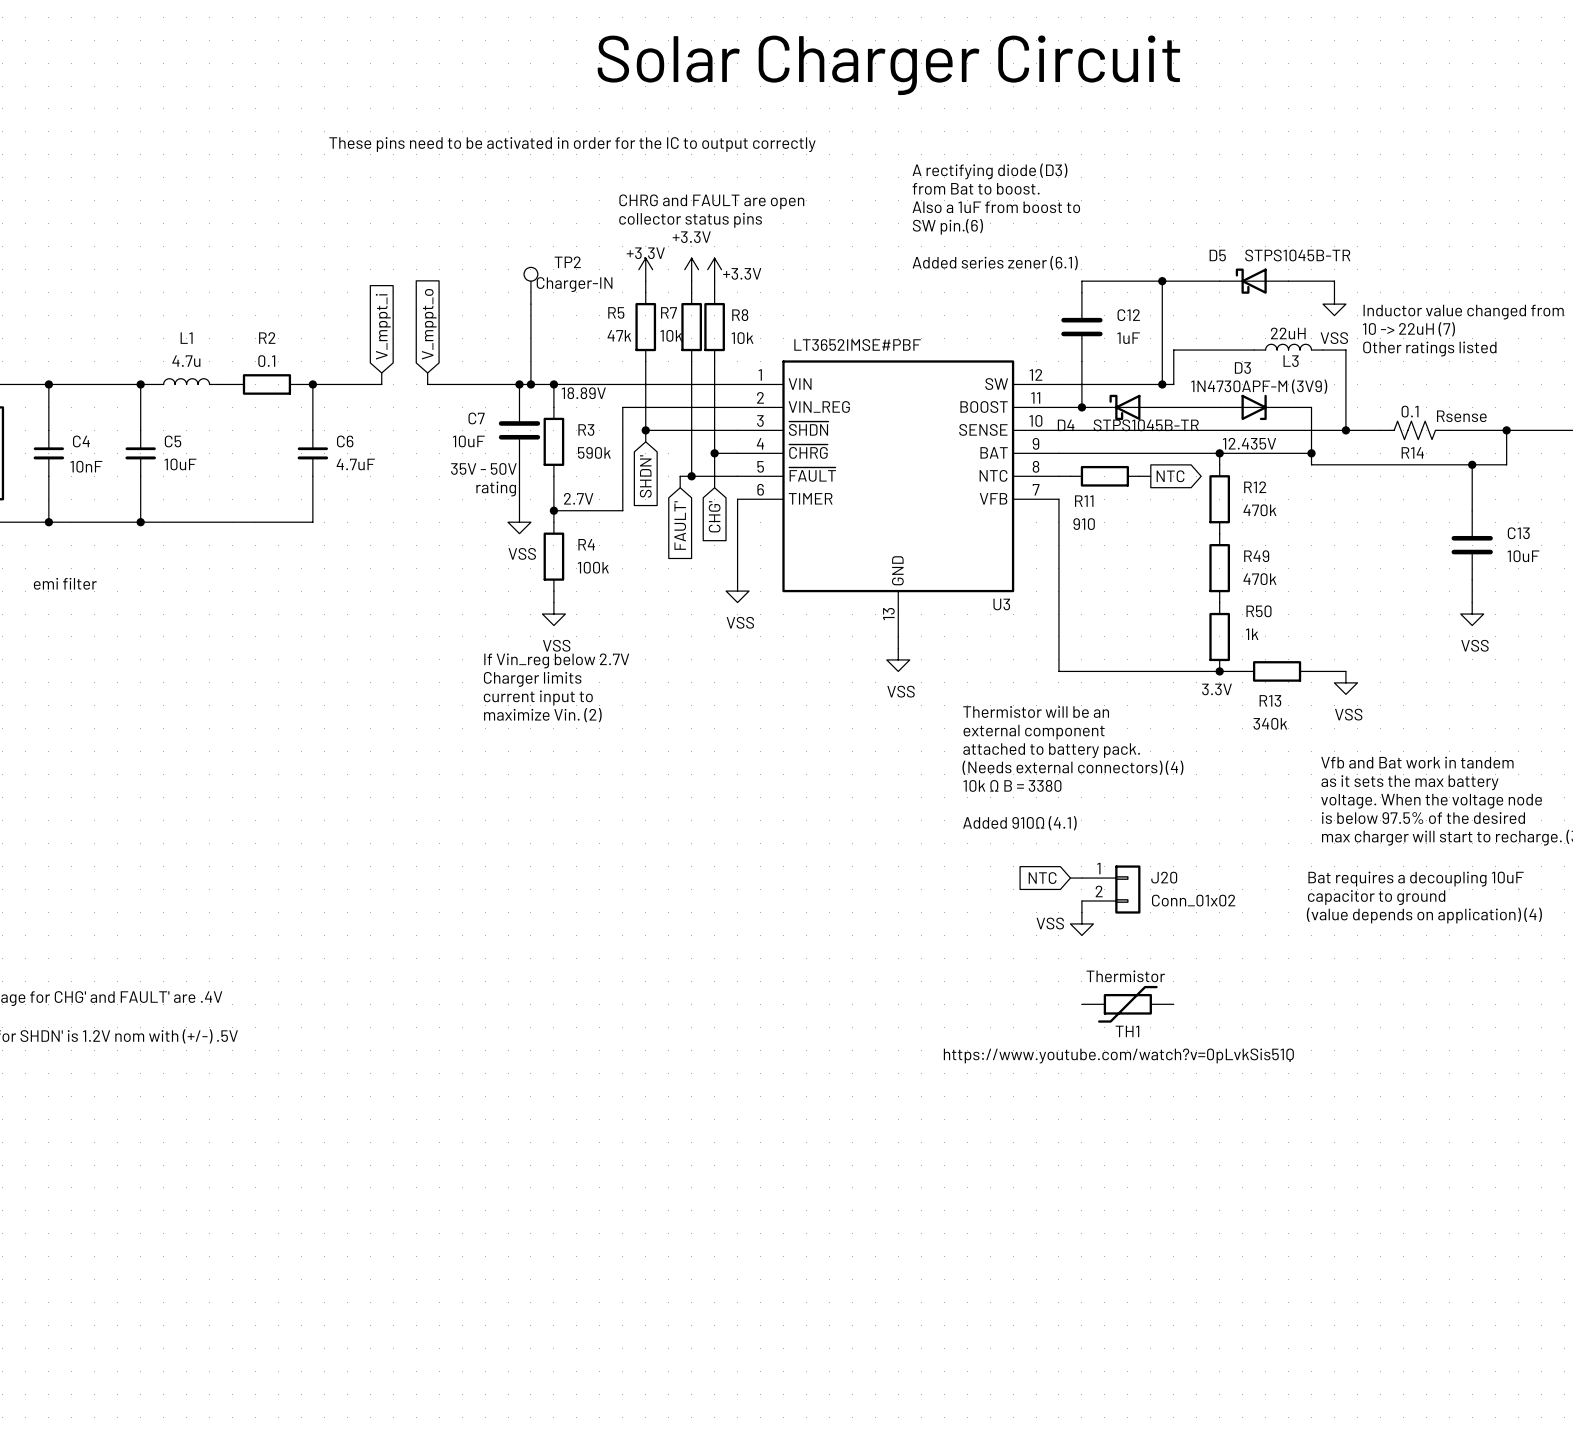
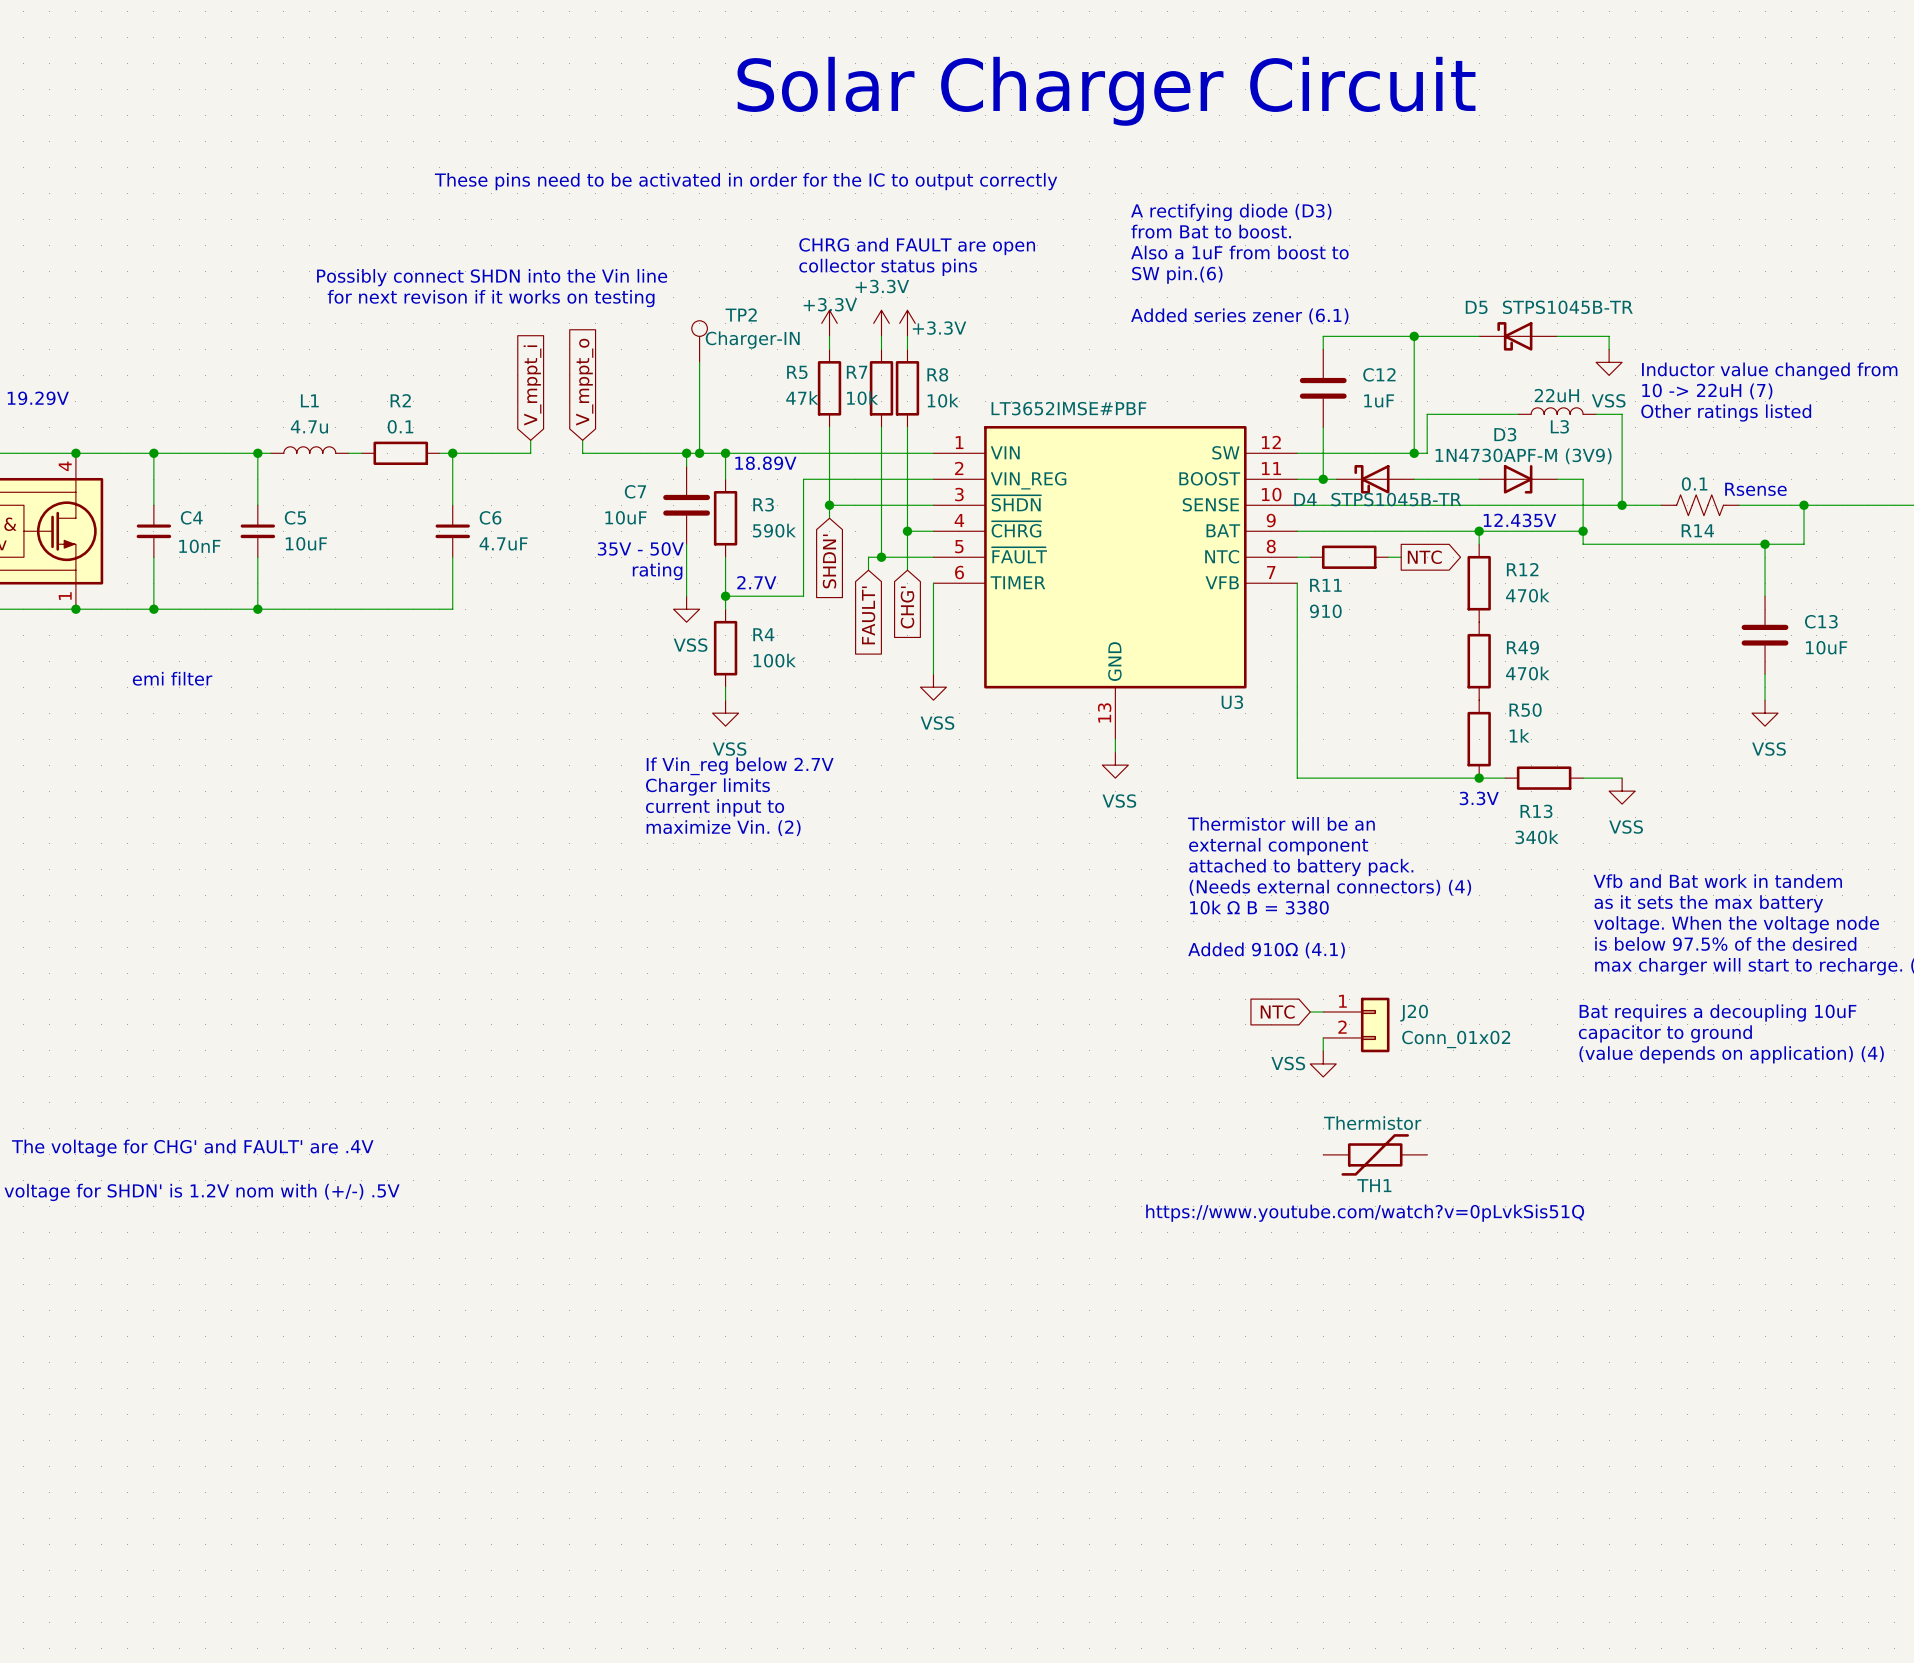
text: none -> Possibly connect SHDN into the Vin line (492, 277)
text: none -> for next revison if it works on testing (491, 298)

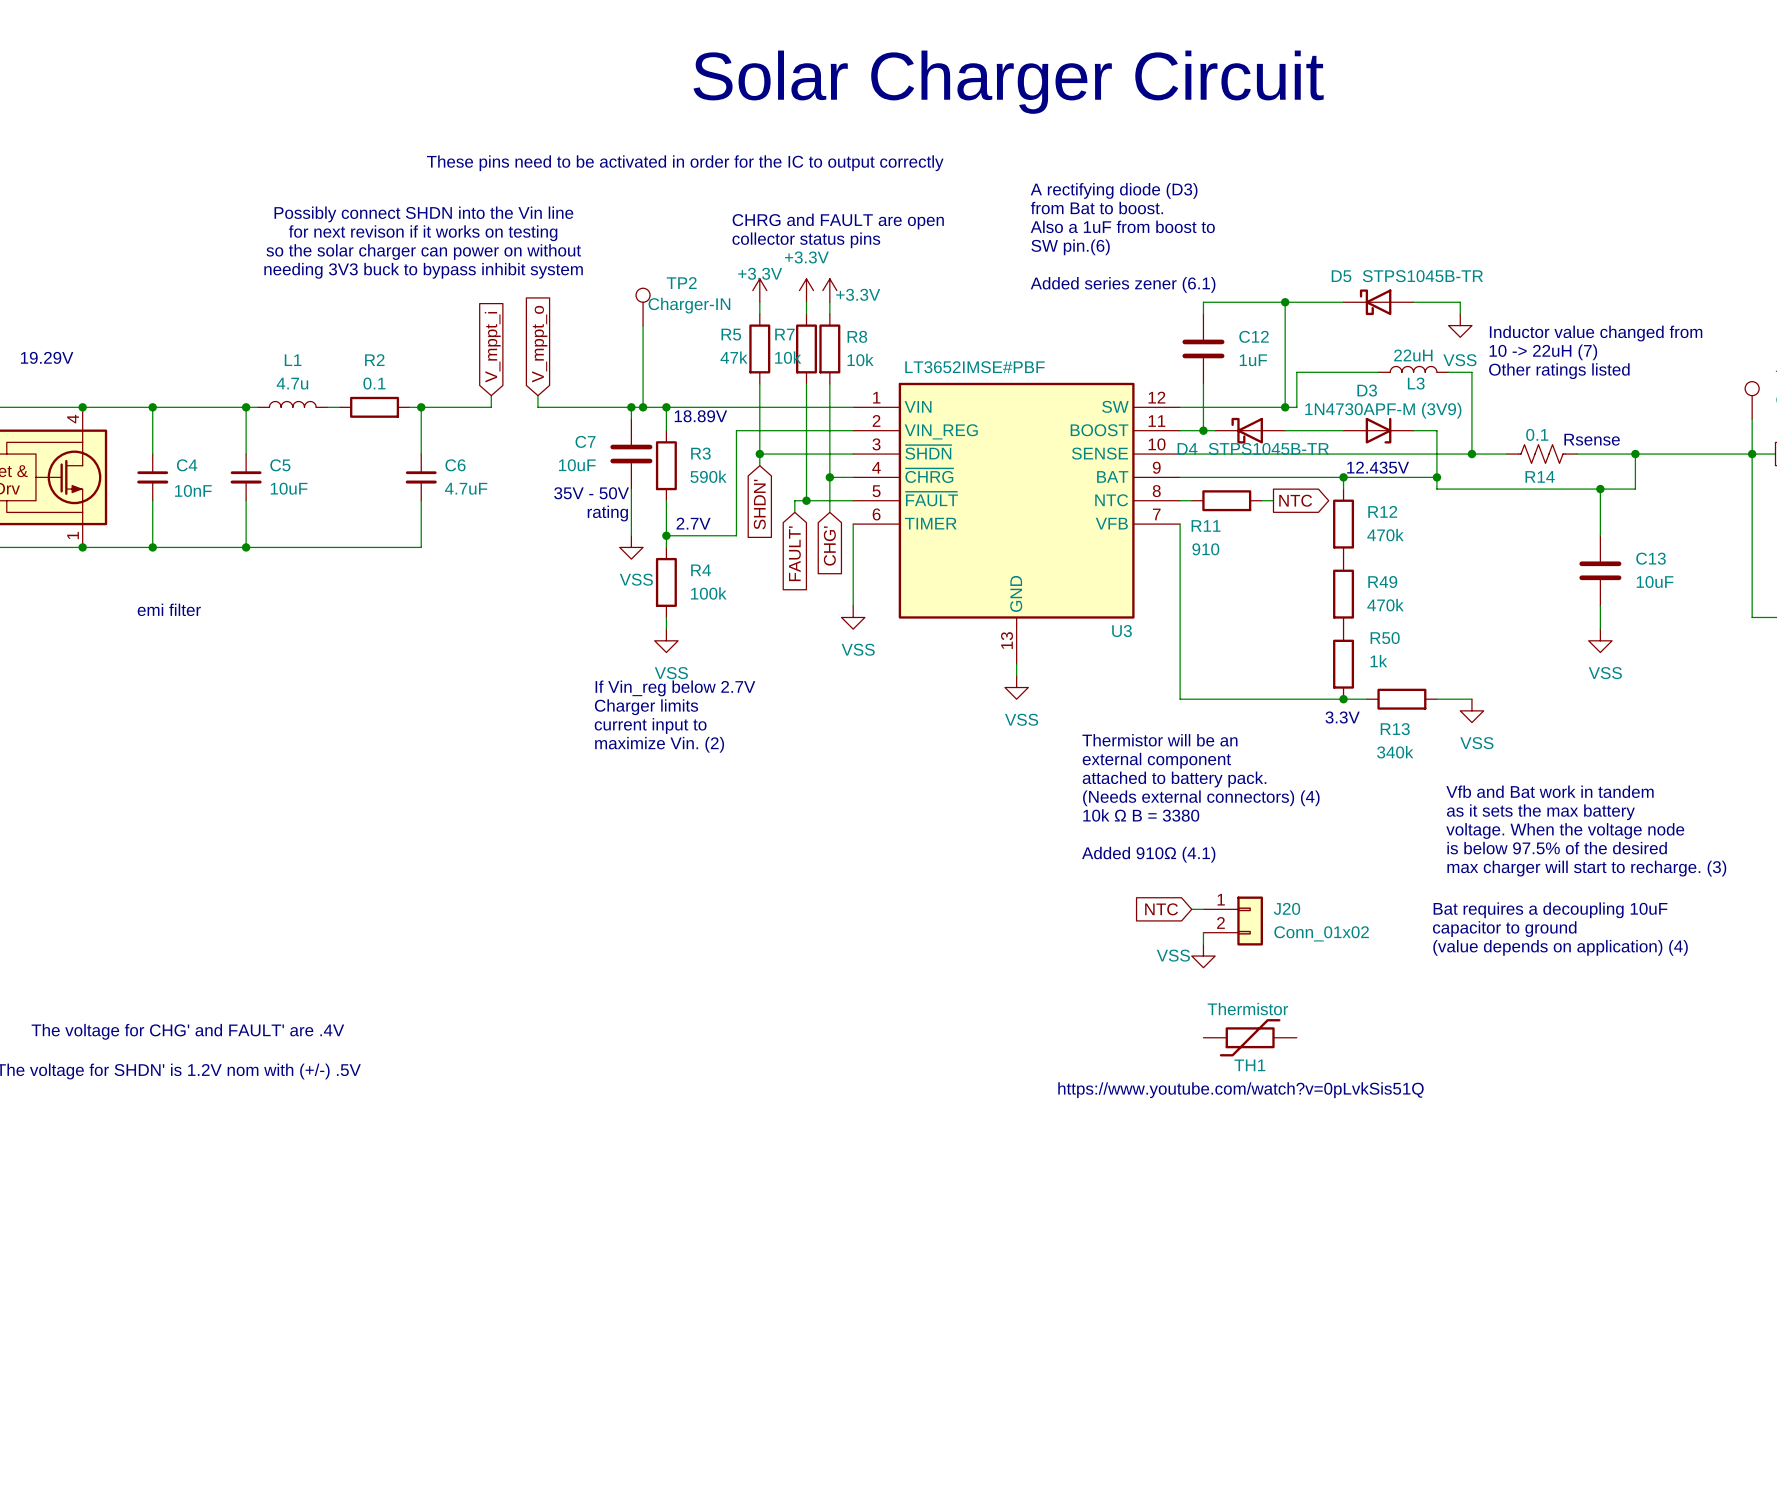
text position: Possibly connect SHDN into the Vin line (492, 277) -> Possibly connect SHDN into the Vin line (423, 214)
text: none -> so the solar charger can power on without (423, 252)
text position: for next revison if it works on testing (491, 298) -> for next revison if it works on testing (423, 233)
text: none -> needing 3V3 buck to bypass inhibit system (423, 270)

